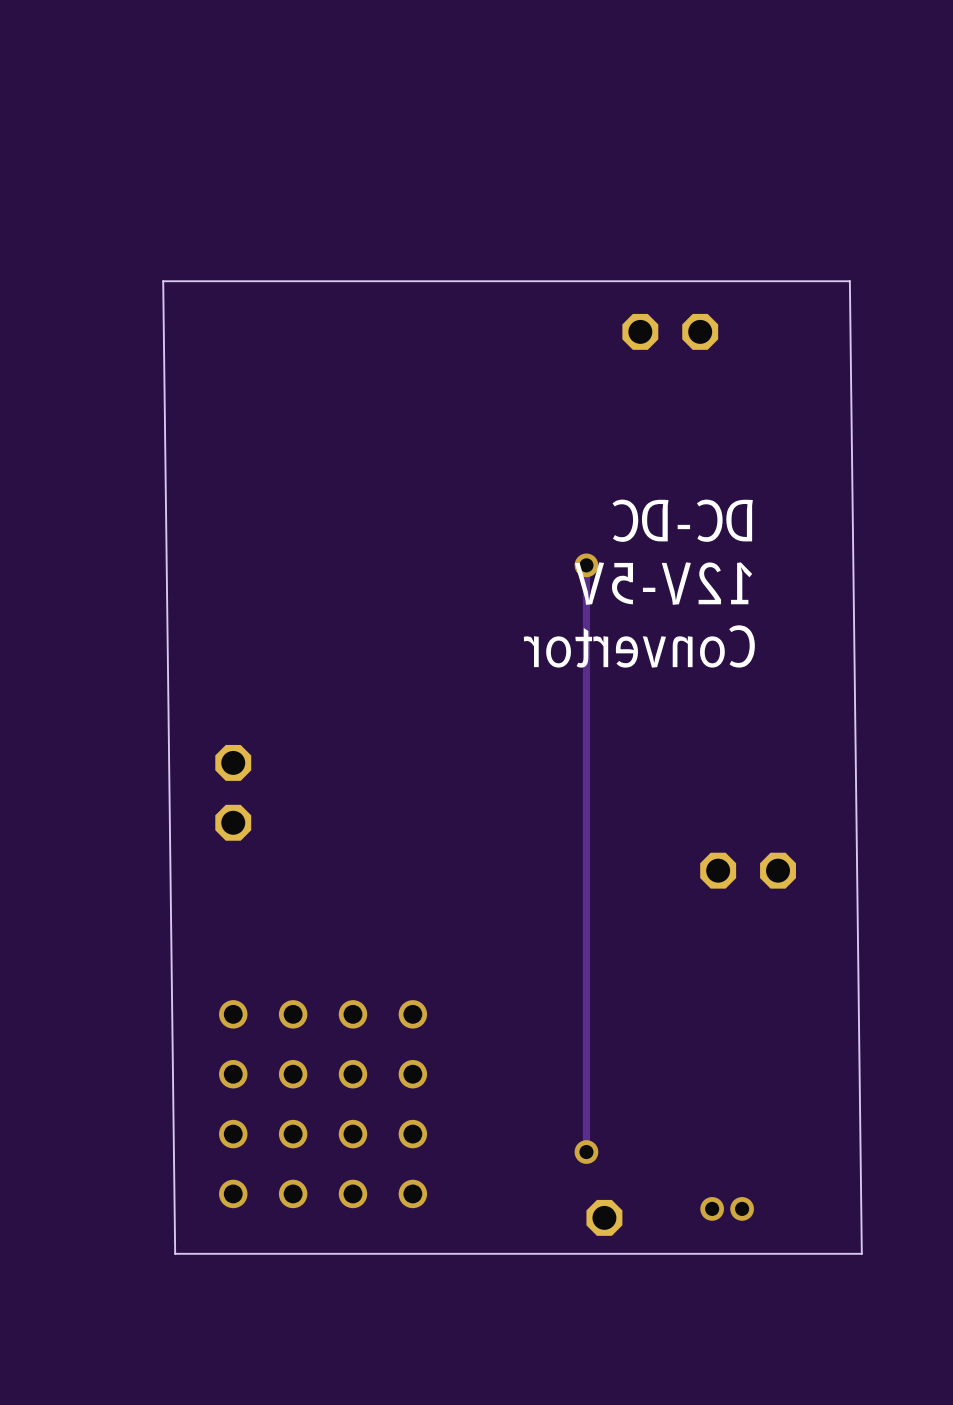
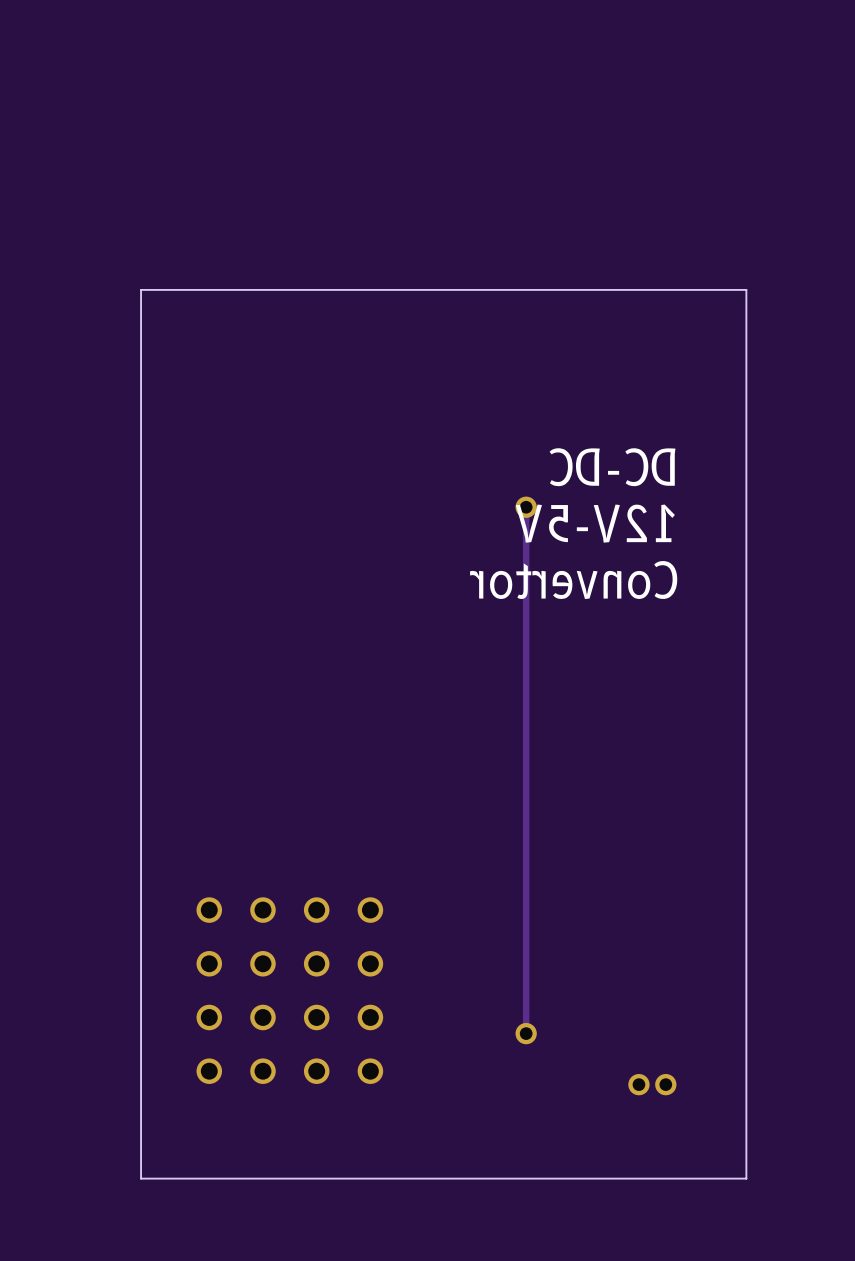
board edge: (849, 281) (163, 281) (175, 1253) (861, 1253) (849, 281) -> (746, 289) (746, 1178) (141, 1178) (141, 289) (746, 289)
part: (640, 331) -> none
part: (700, 331) -> none
part: (233, 762) -> none
part: (233, 822) -> none
part: (718, 870) -> none
part: (778, 870) -> none
part: (604, 1217) -> none

